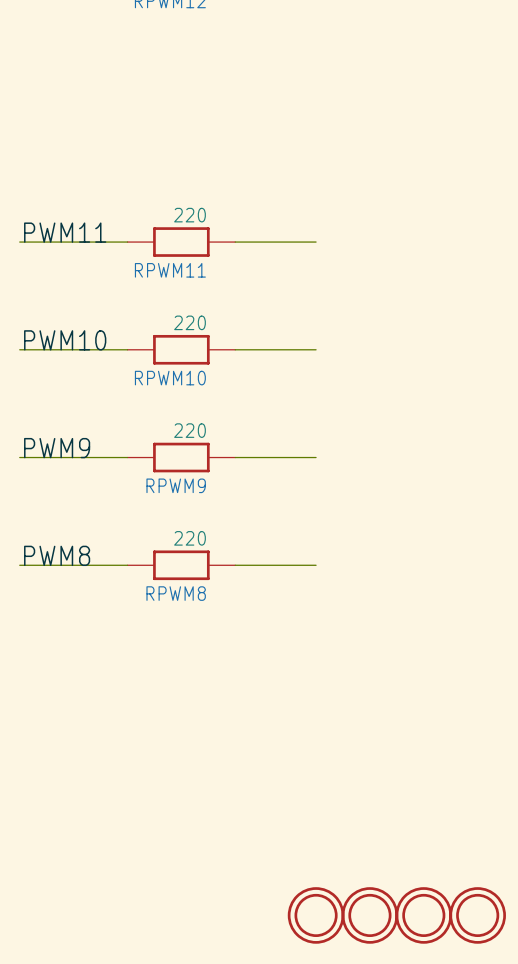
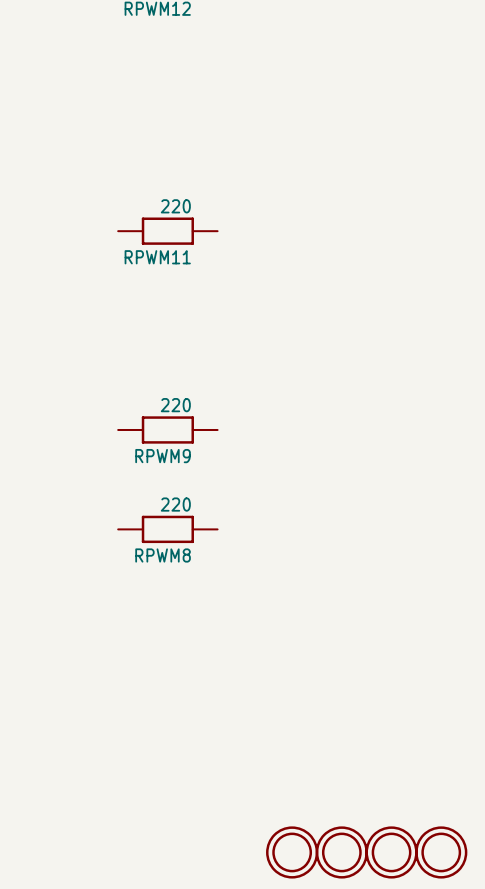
label: PWM11 (65, 232) -> none
wire: (19, 242) (127, 242) -> none
wire: (235, 242) (316, 242) -> none
label: PWM10 (65, 340) -> none
wire: (19, 349) (127, 349) -> none
RPWM10: 220 (181, 349) -> none
wire: (235, 349) (316, 349) -> none
label: PWM9 (57, 448) -> none
wire: (19, 457) (127, 457) -> none
wire: (235, 457) (316, 457) -> none
label: PWM8 (57, 555) -> none
wire: (19, 565) (127, 565) -> none
wire: (235, 565) (316, 565) -> none

